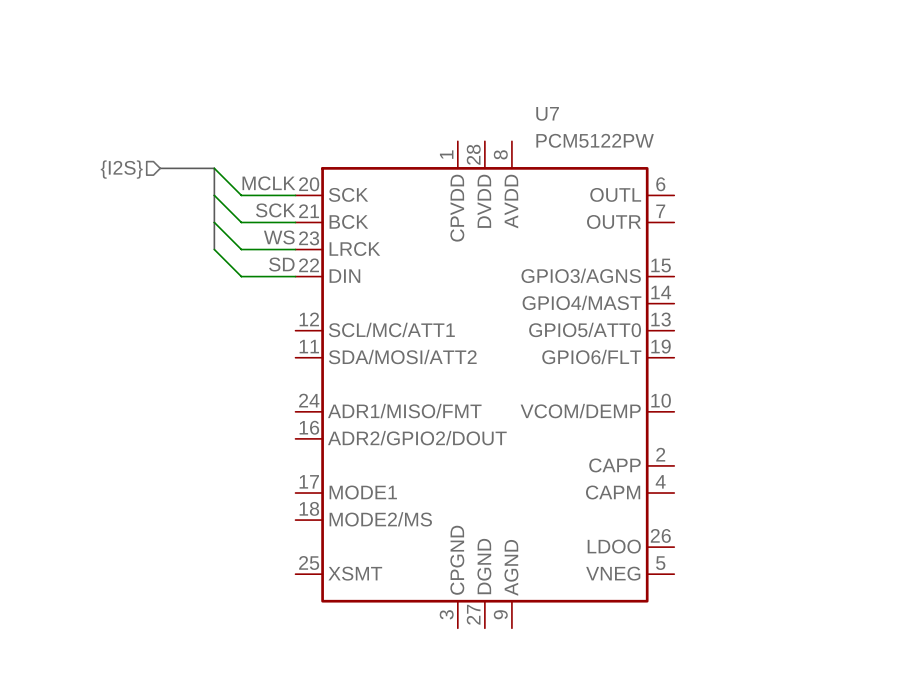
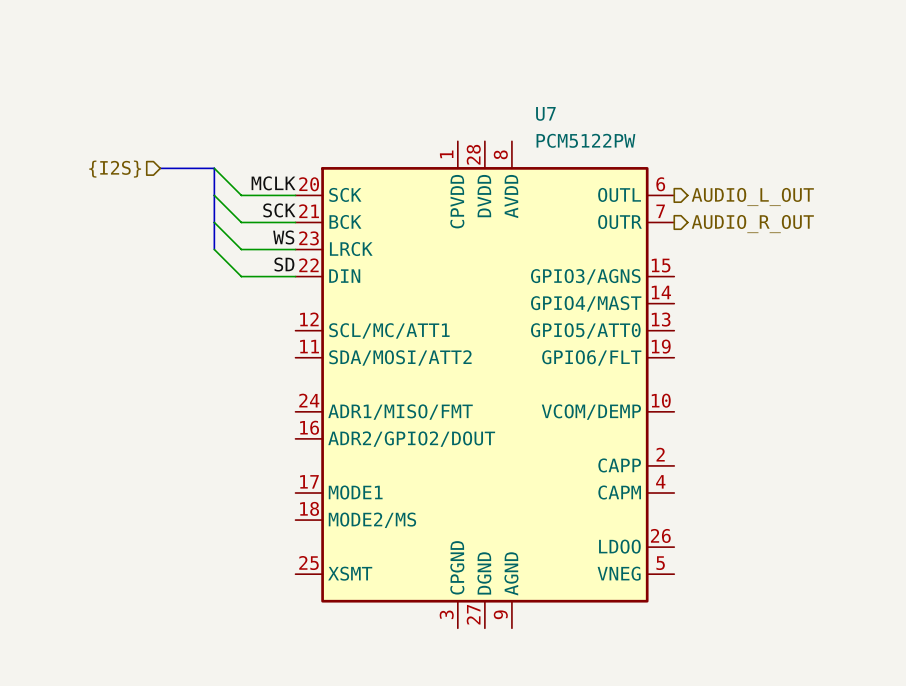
hierarchical label: none -> AUDIO_L_OUT (752, 196)
hierarchical label: none -> AUDIO_R_OUT (752, 224)

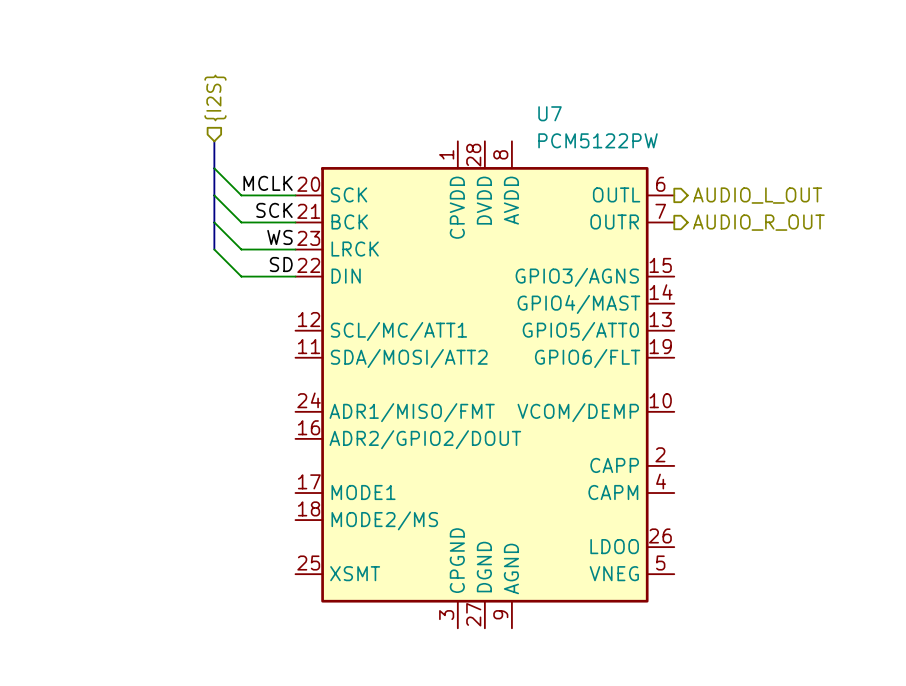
bus: (160, 168) (214, 168) -> (214, 141) (214, 168)
hierarchical label rotation: 0° (115, 169) -> 90° clockwise (215, 97)
hierarchical label position: {I2S} (115, 169) -> {I2S} (215, 97)

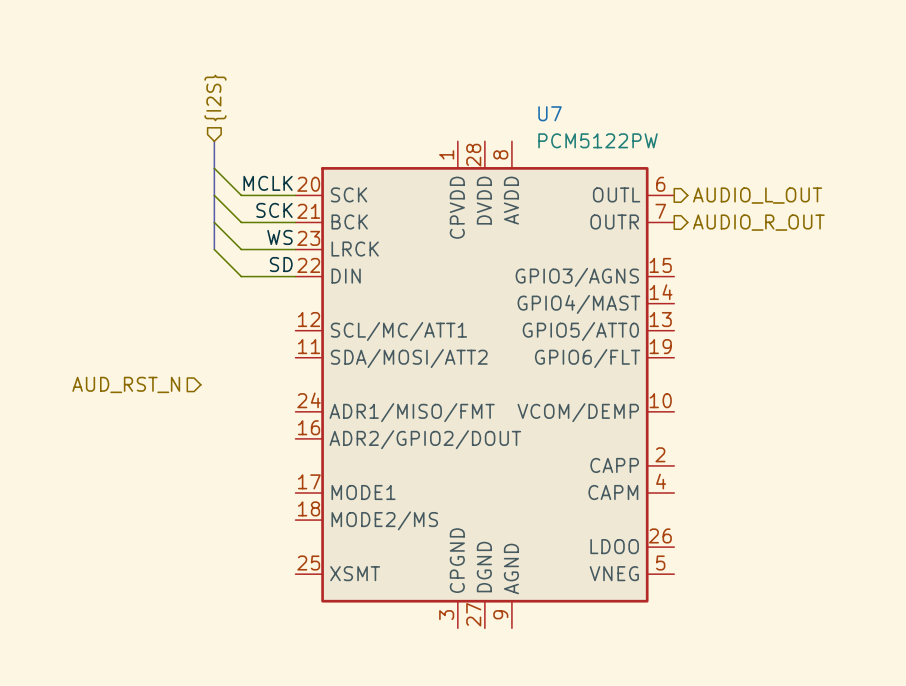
hierarchical label: none -> AUD_RST_N (126, 384)

